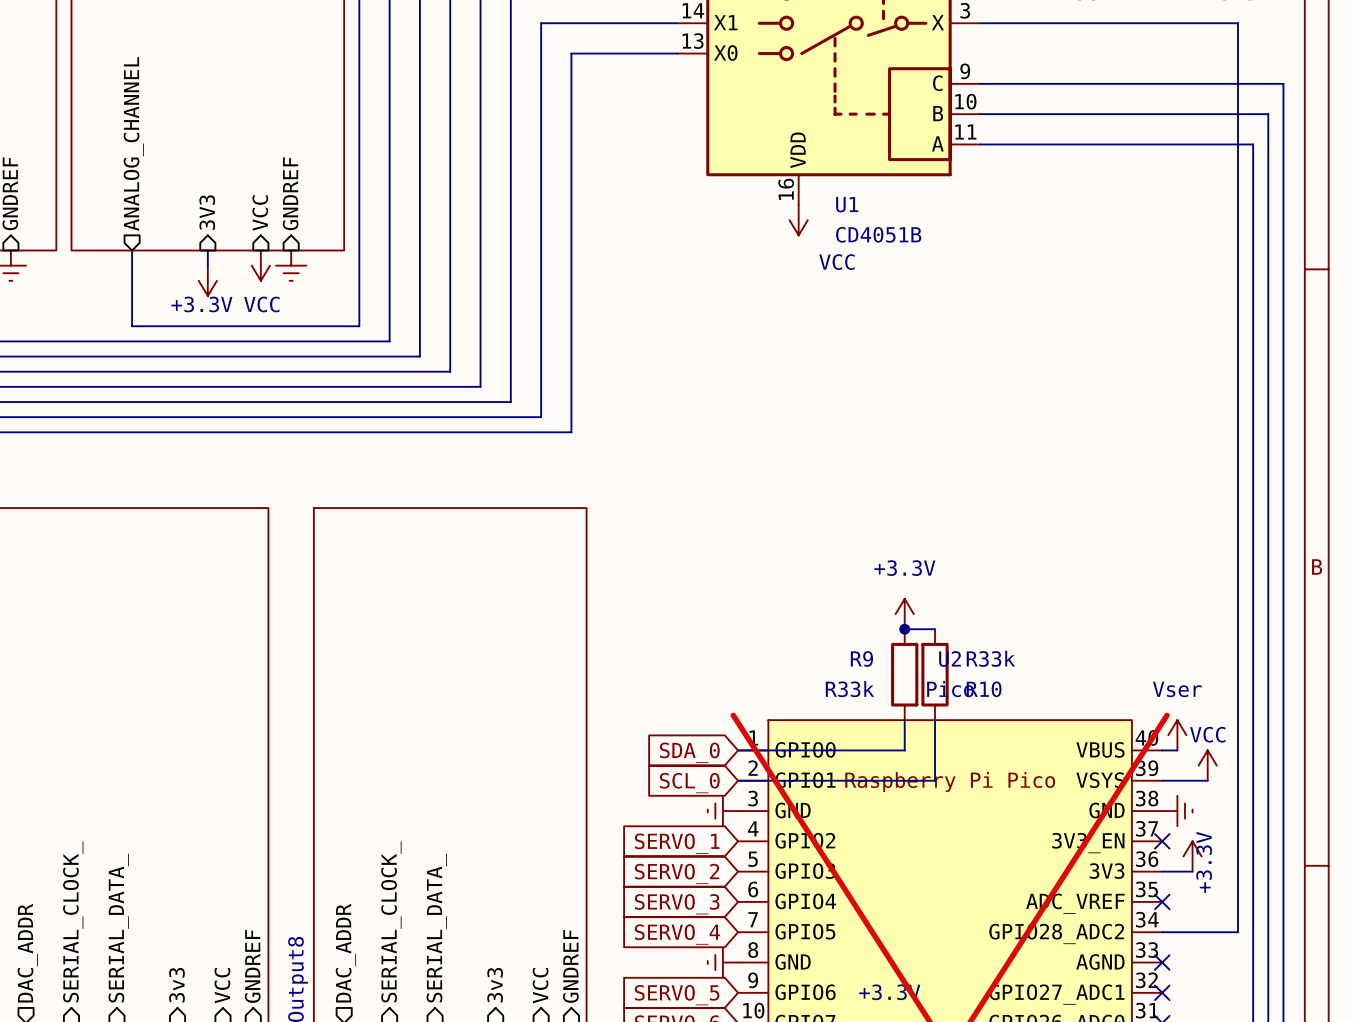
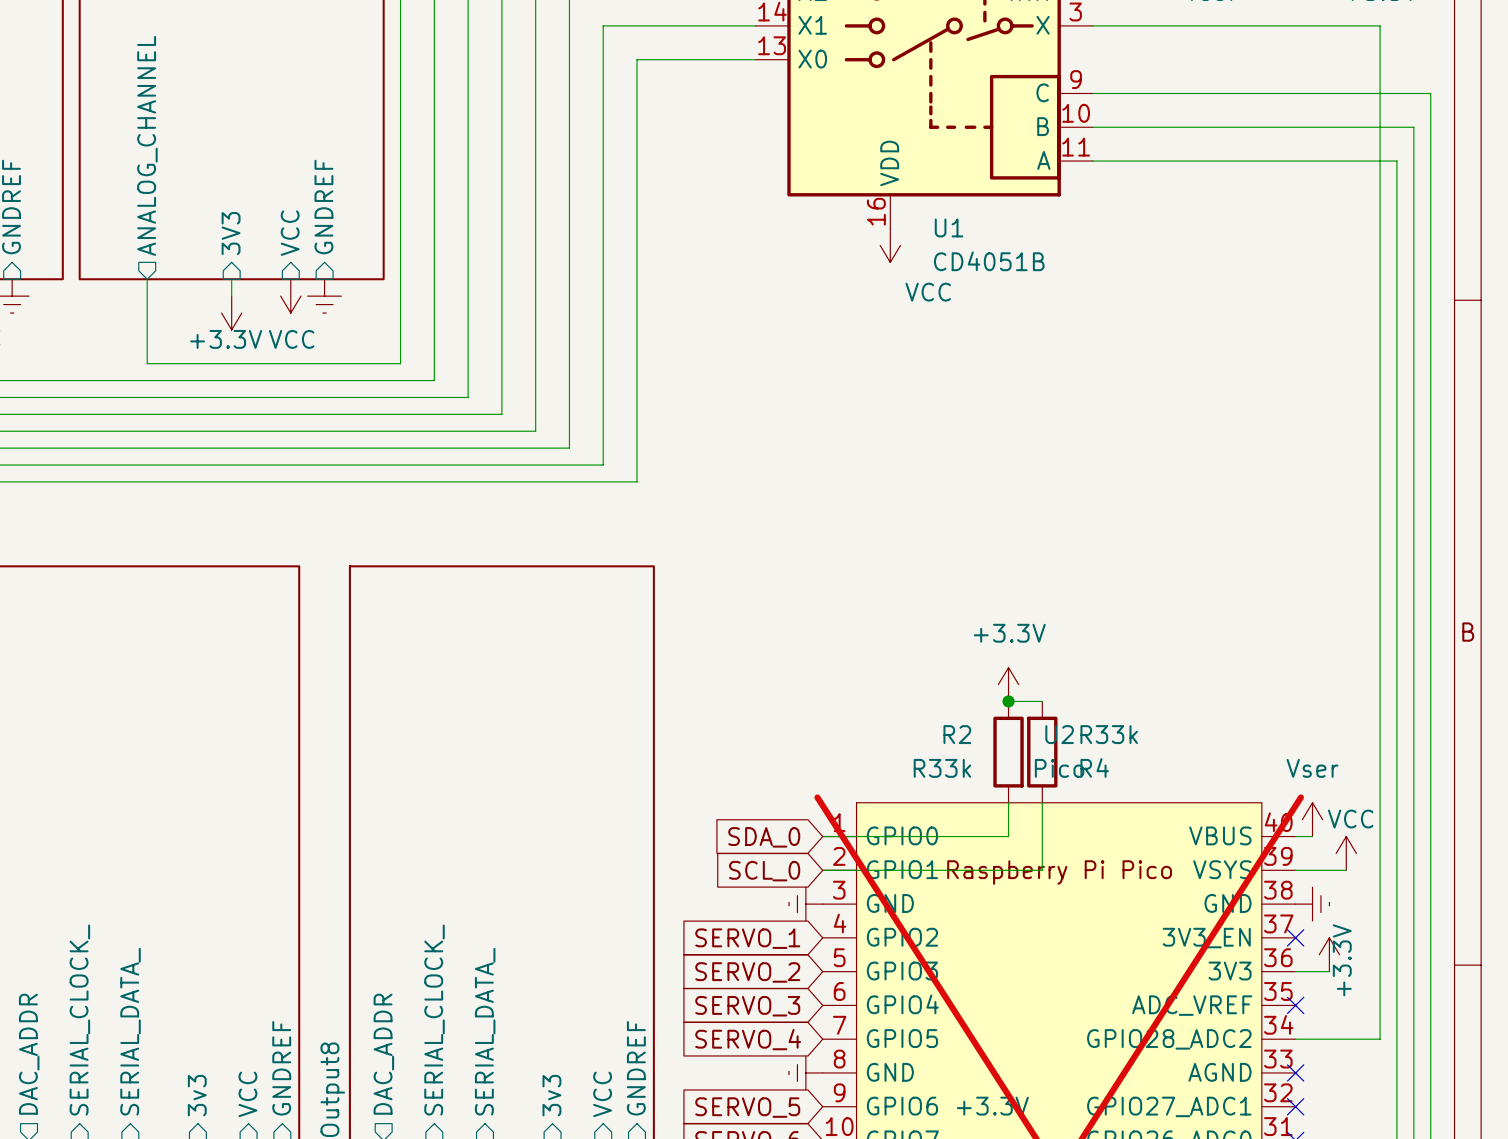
R9 name: R9 (861, 658) -> R2 (957, 734)
R10 name: R10 (984, 689) -> R4 (1094, 767)

